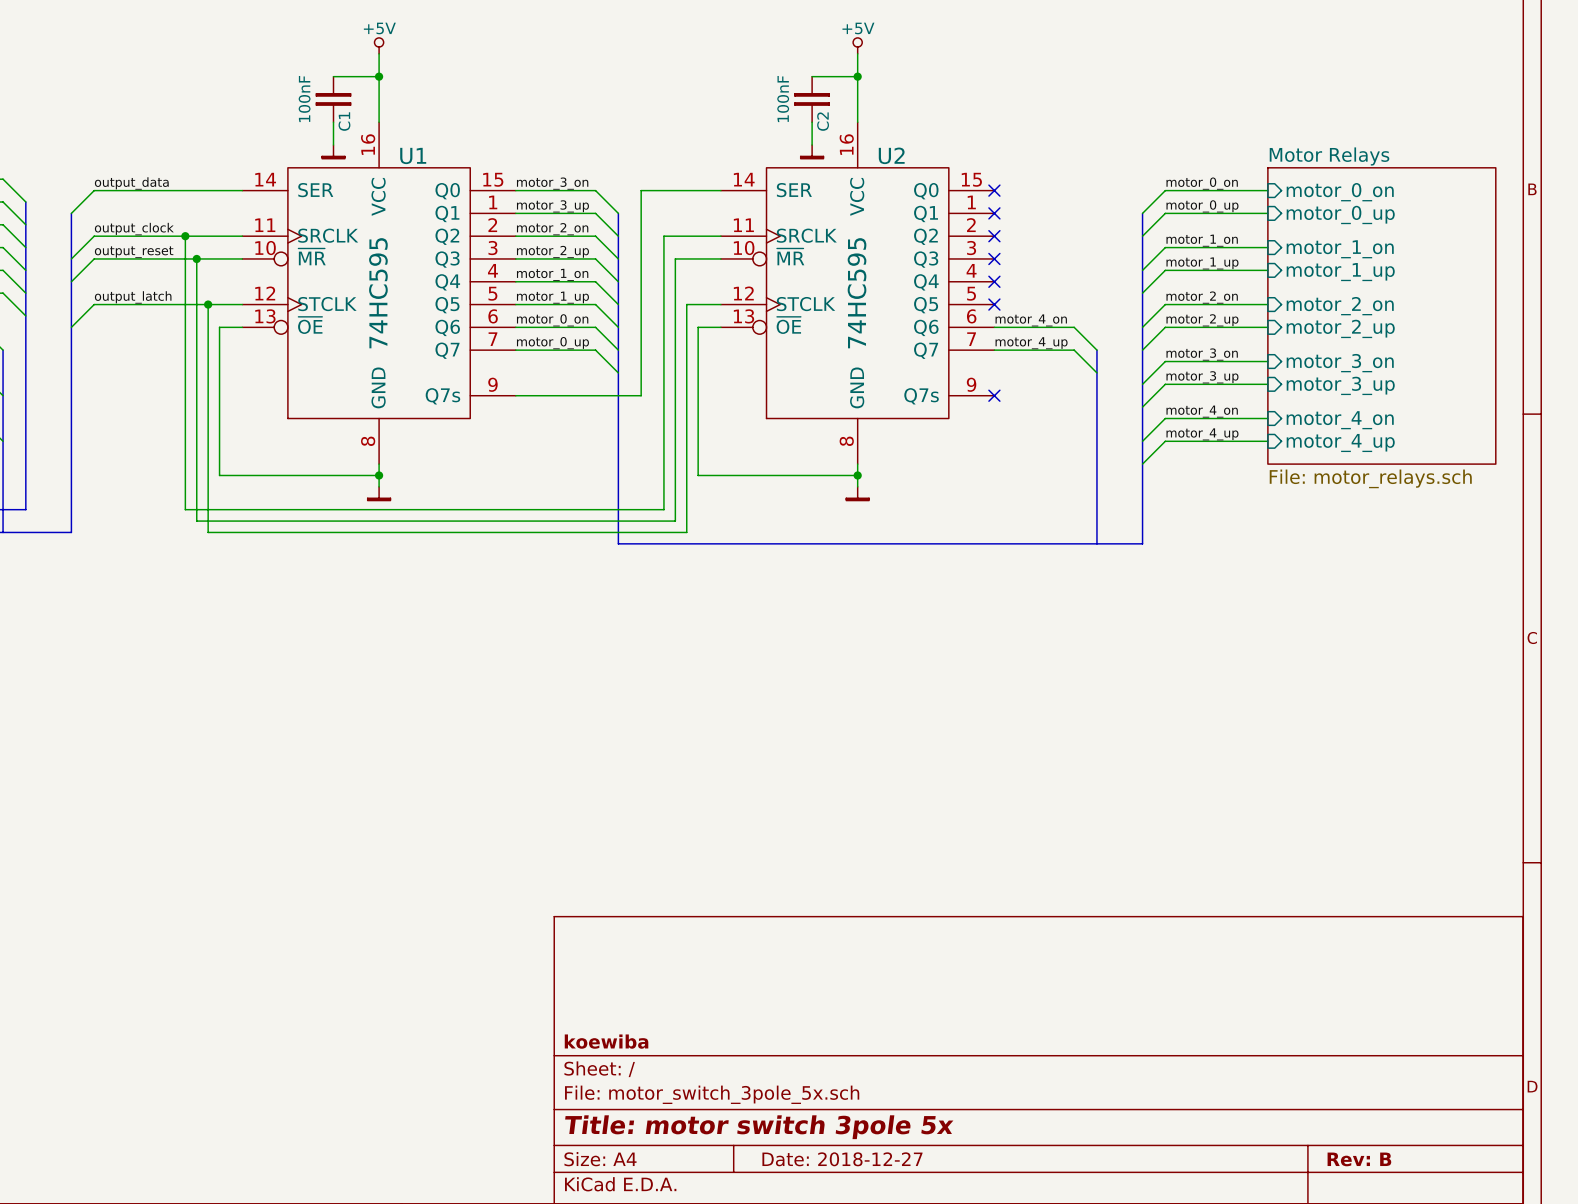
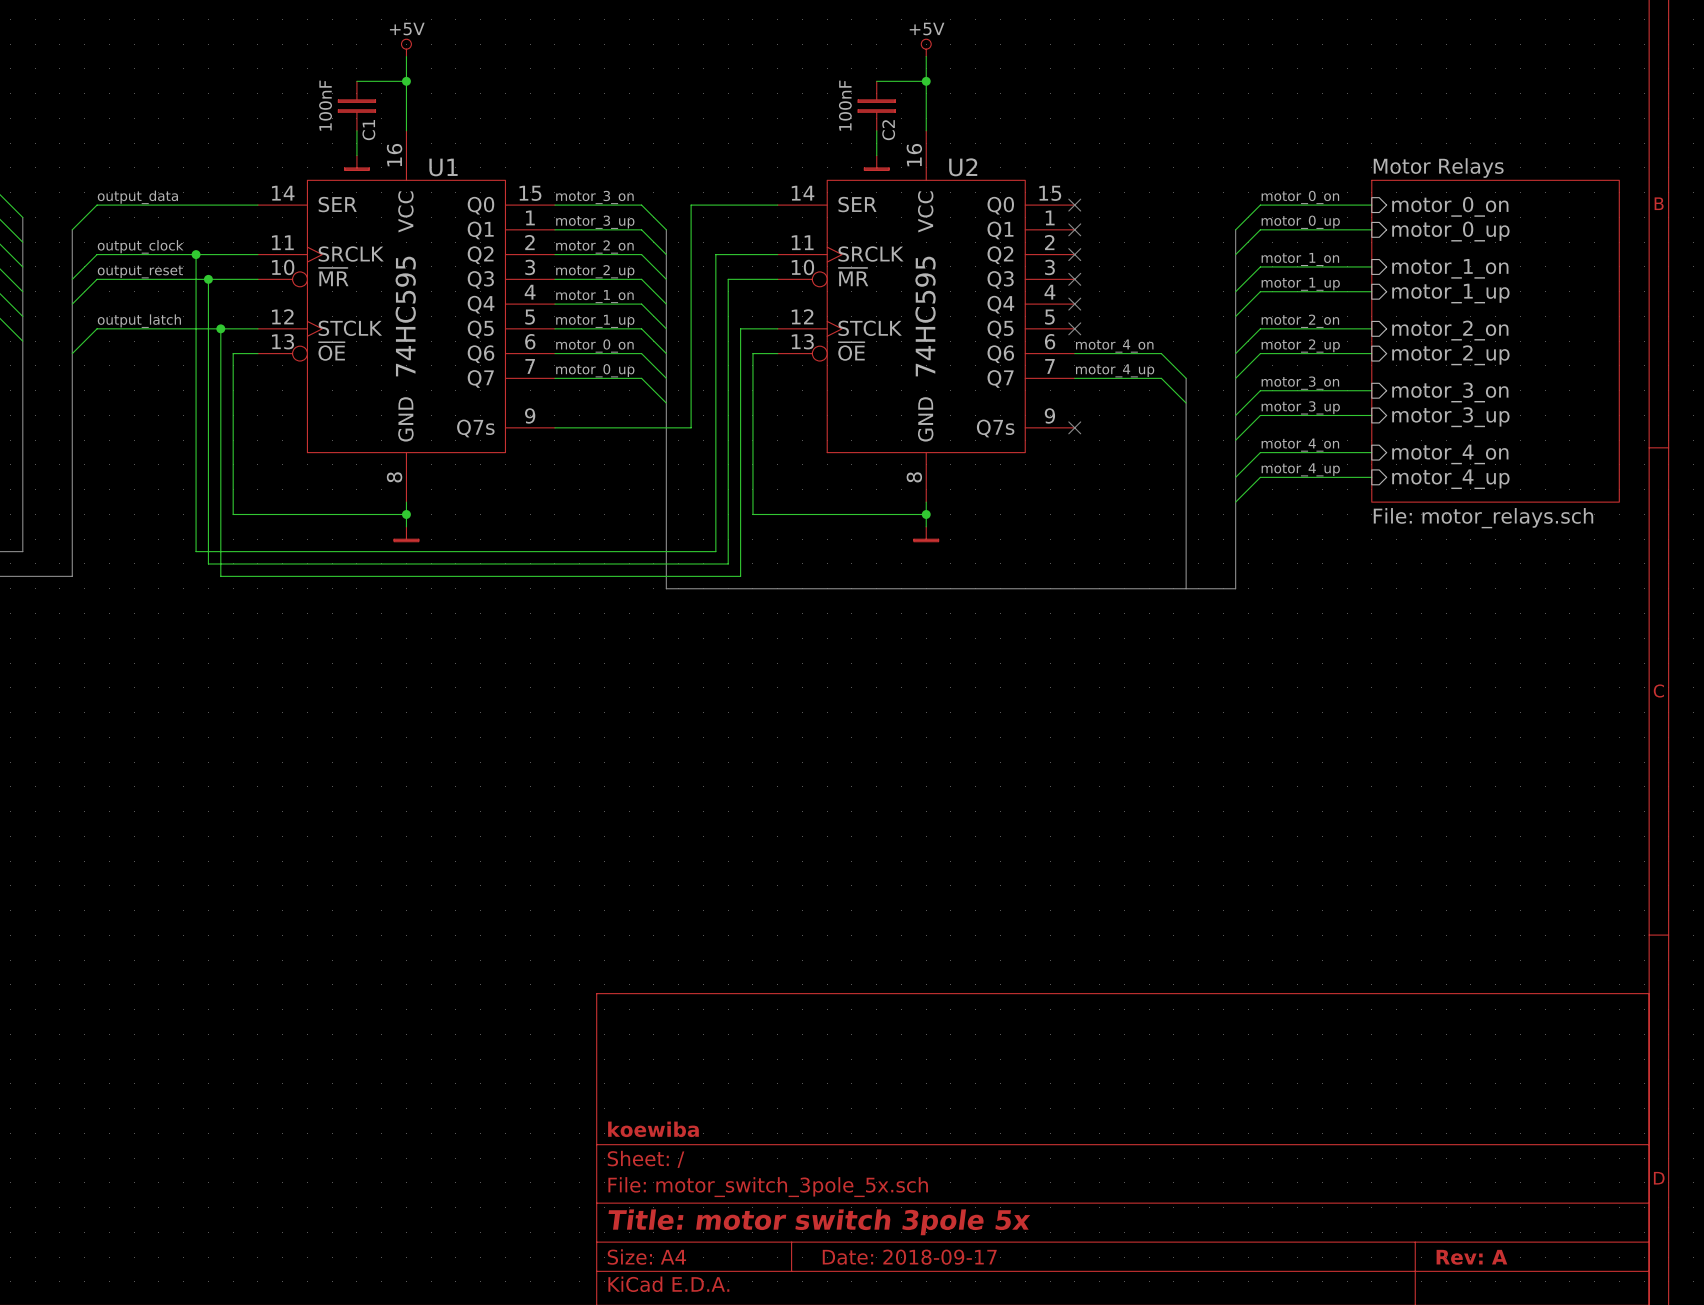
title block: Date: 2018-12-27 (842, 1159) -> Date: 2018-09-17 (909, 1257)
title block: Rev: B (1359, 1159) -> Rev: A (1471, 1257)

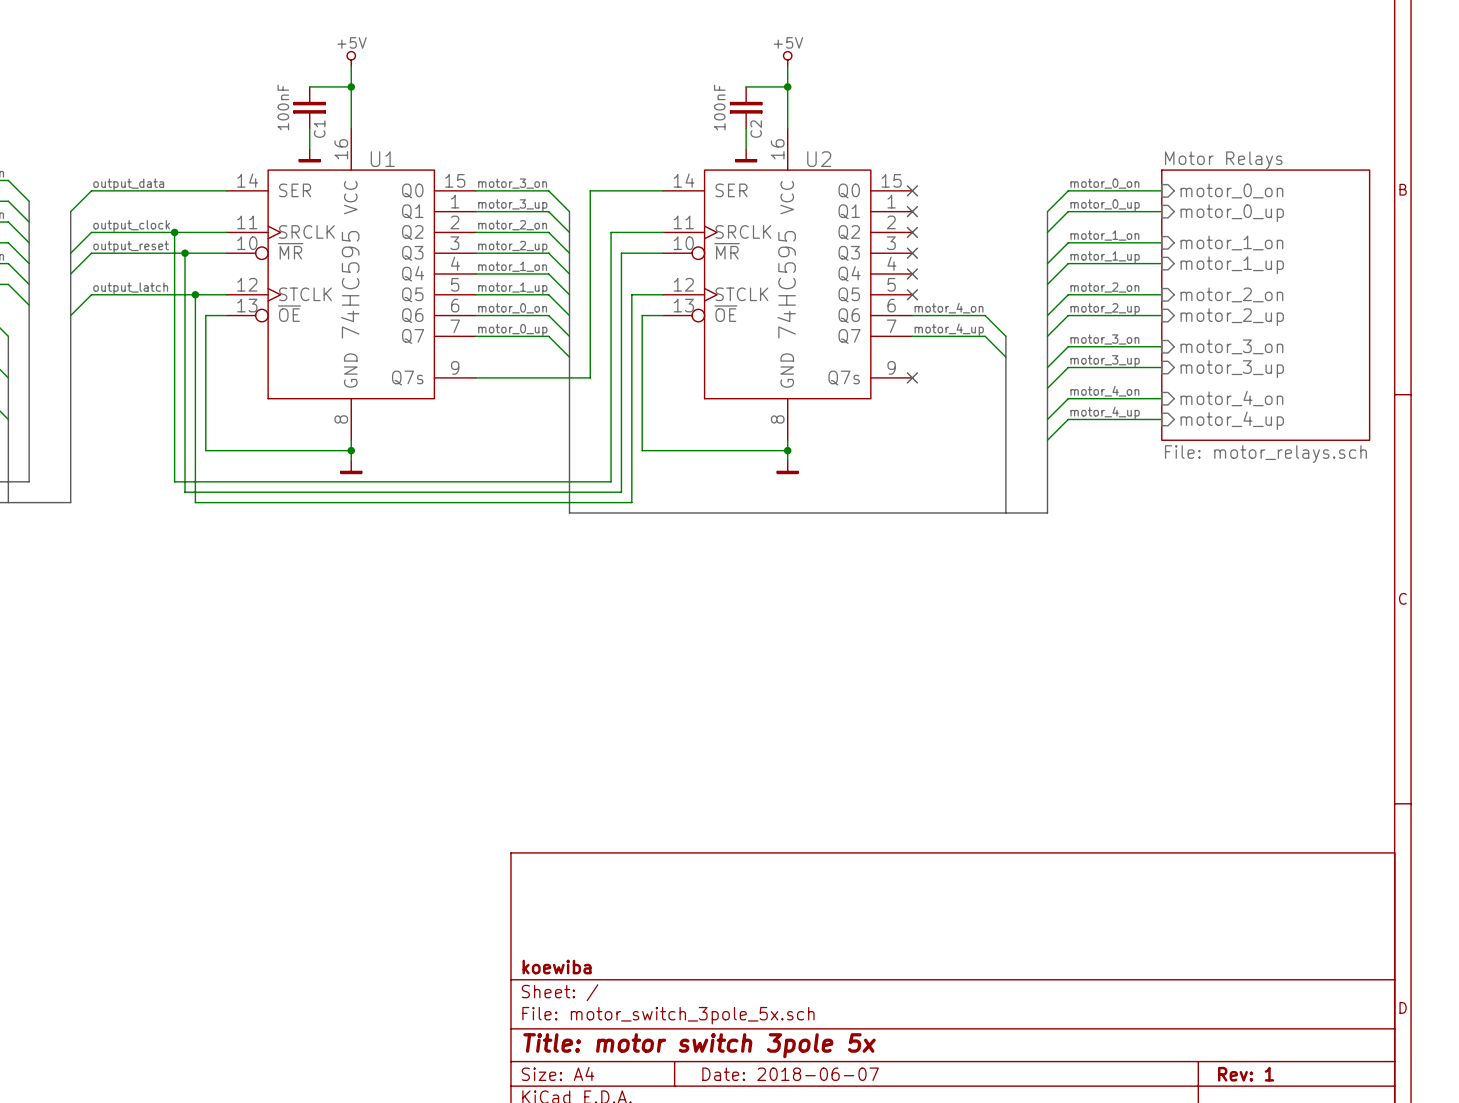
title block: Date: 2018-09-17 (909, 1257) -> Date: 2018-06-07 (790, 1074)
title block: Rev: A (1471, 1257) -> Rev: 1 (1246, 1074)

